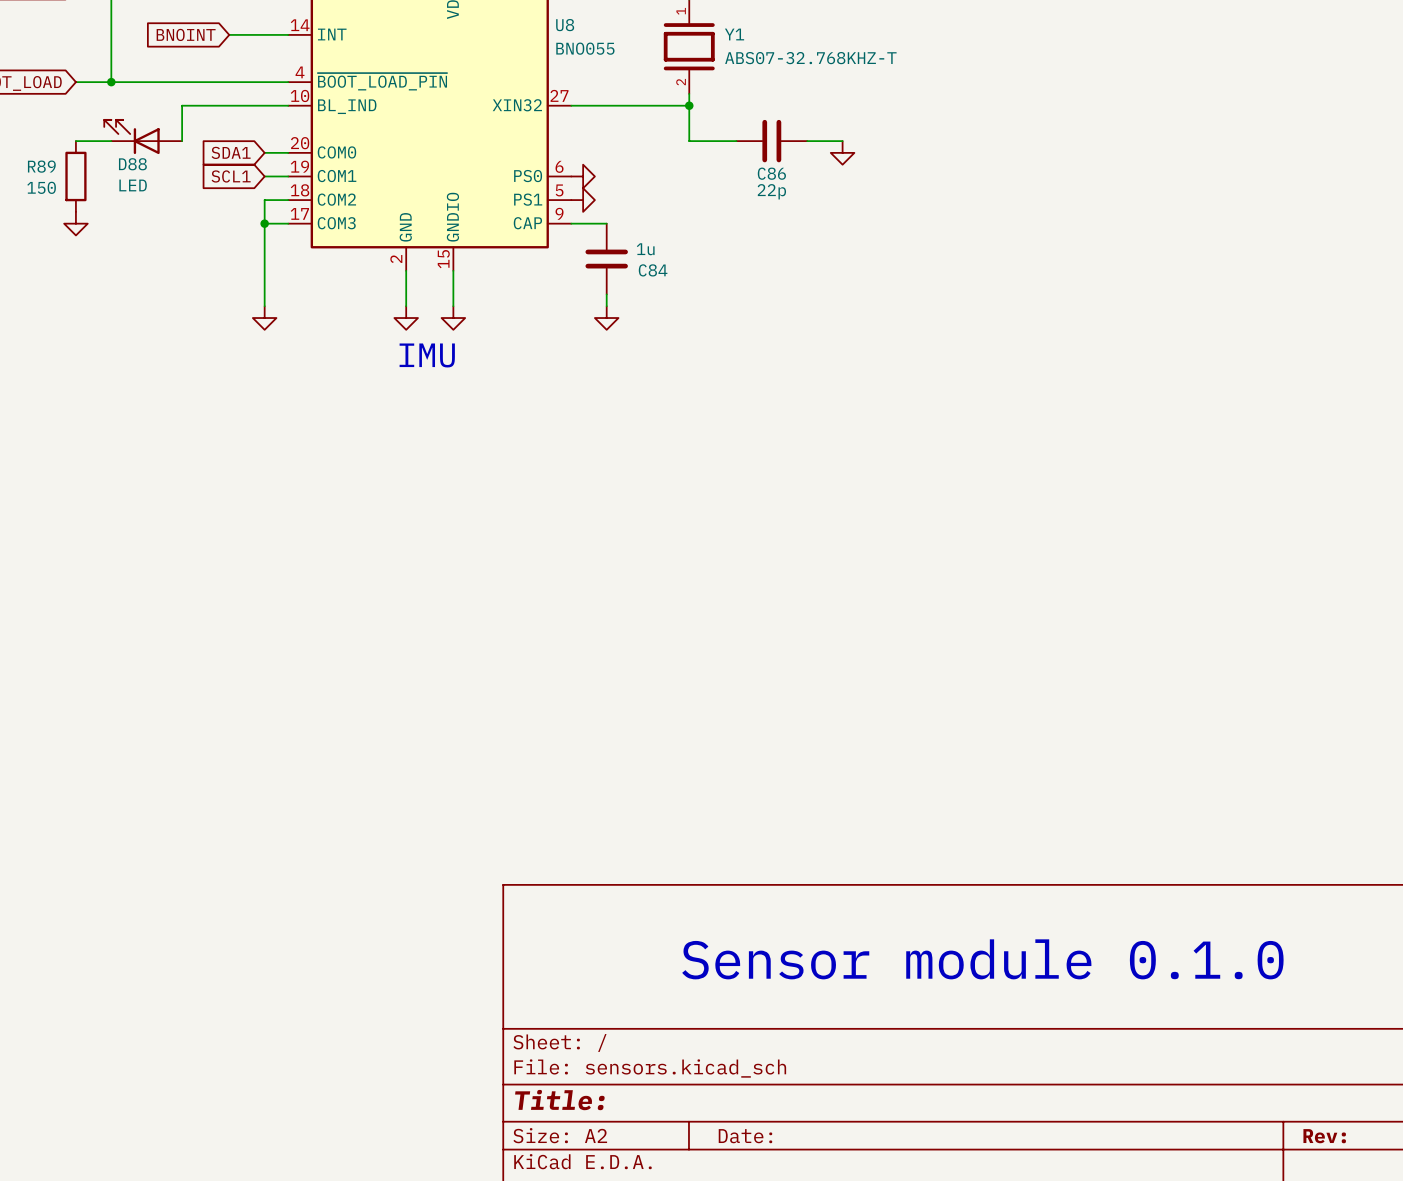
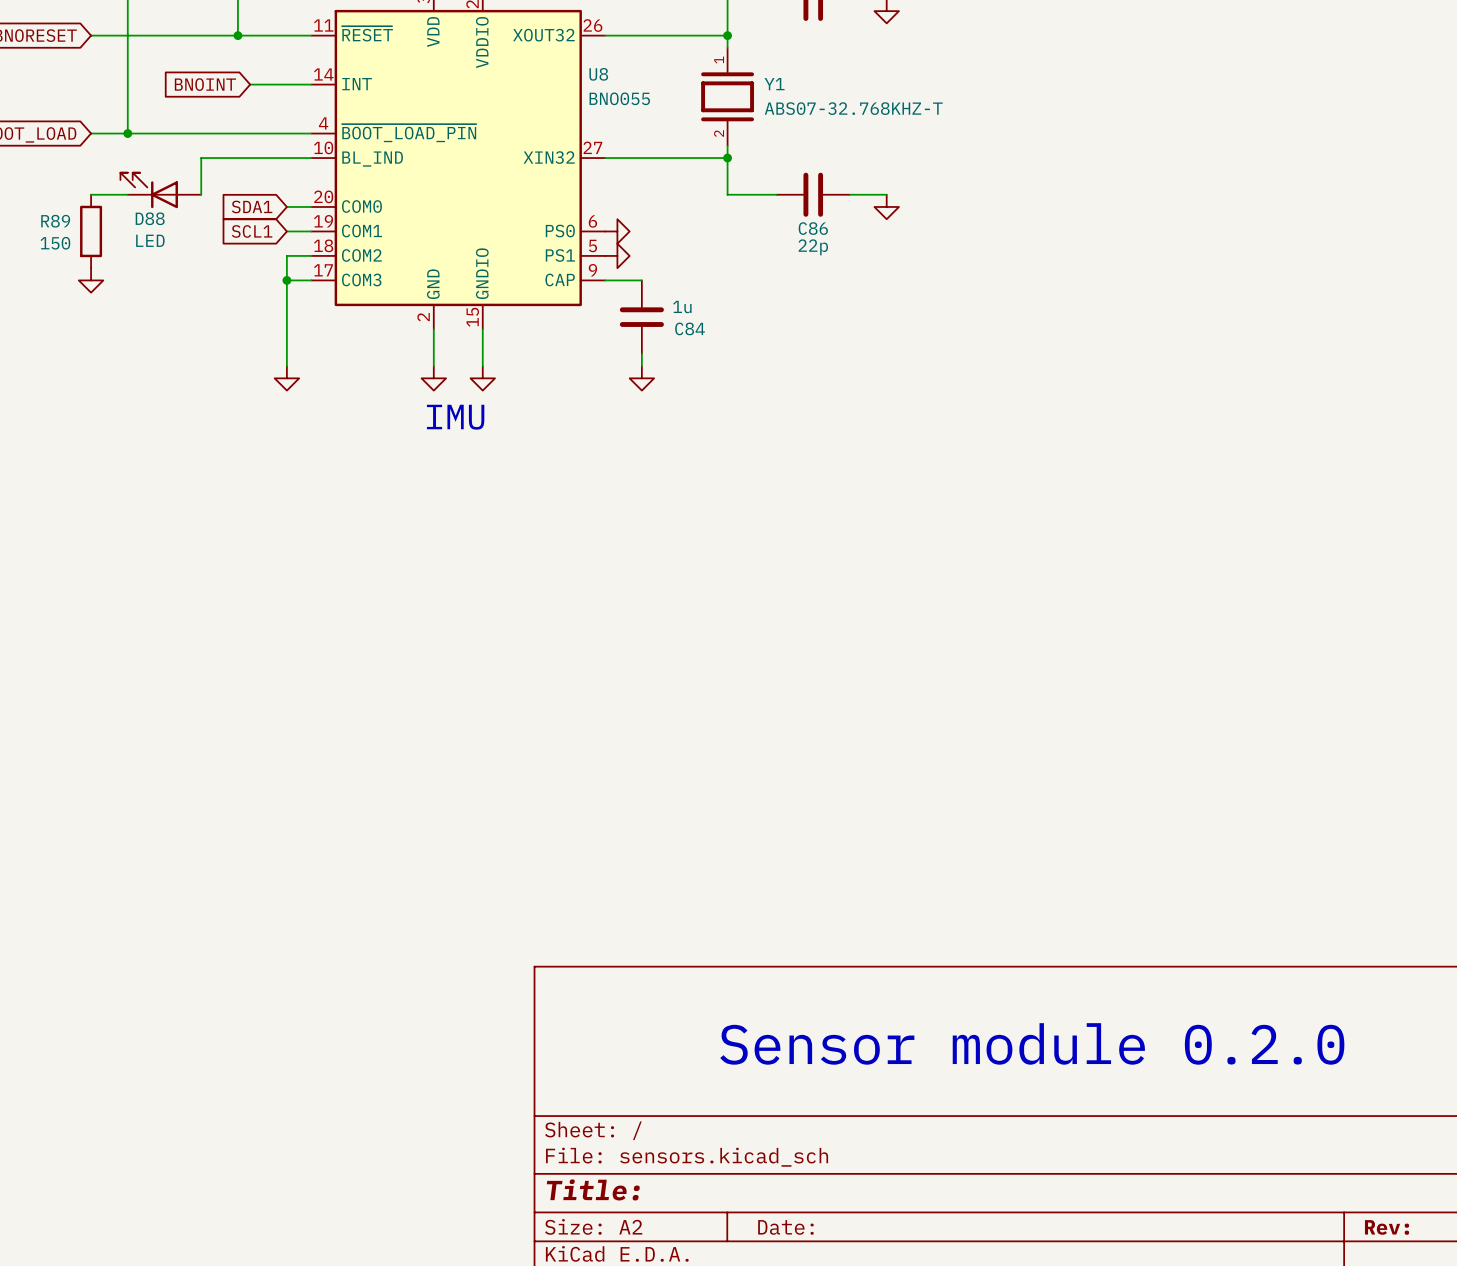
text: Sensor module 0.1.0 (982, 959) -> Sensor module 0.2.0 (1032, 1043)

